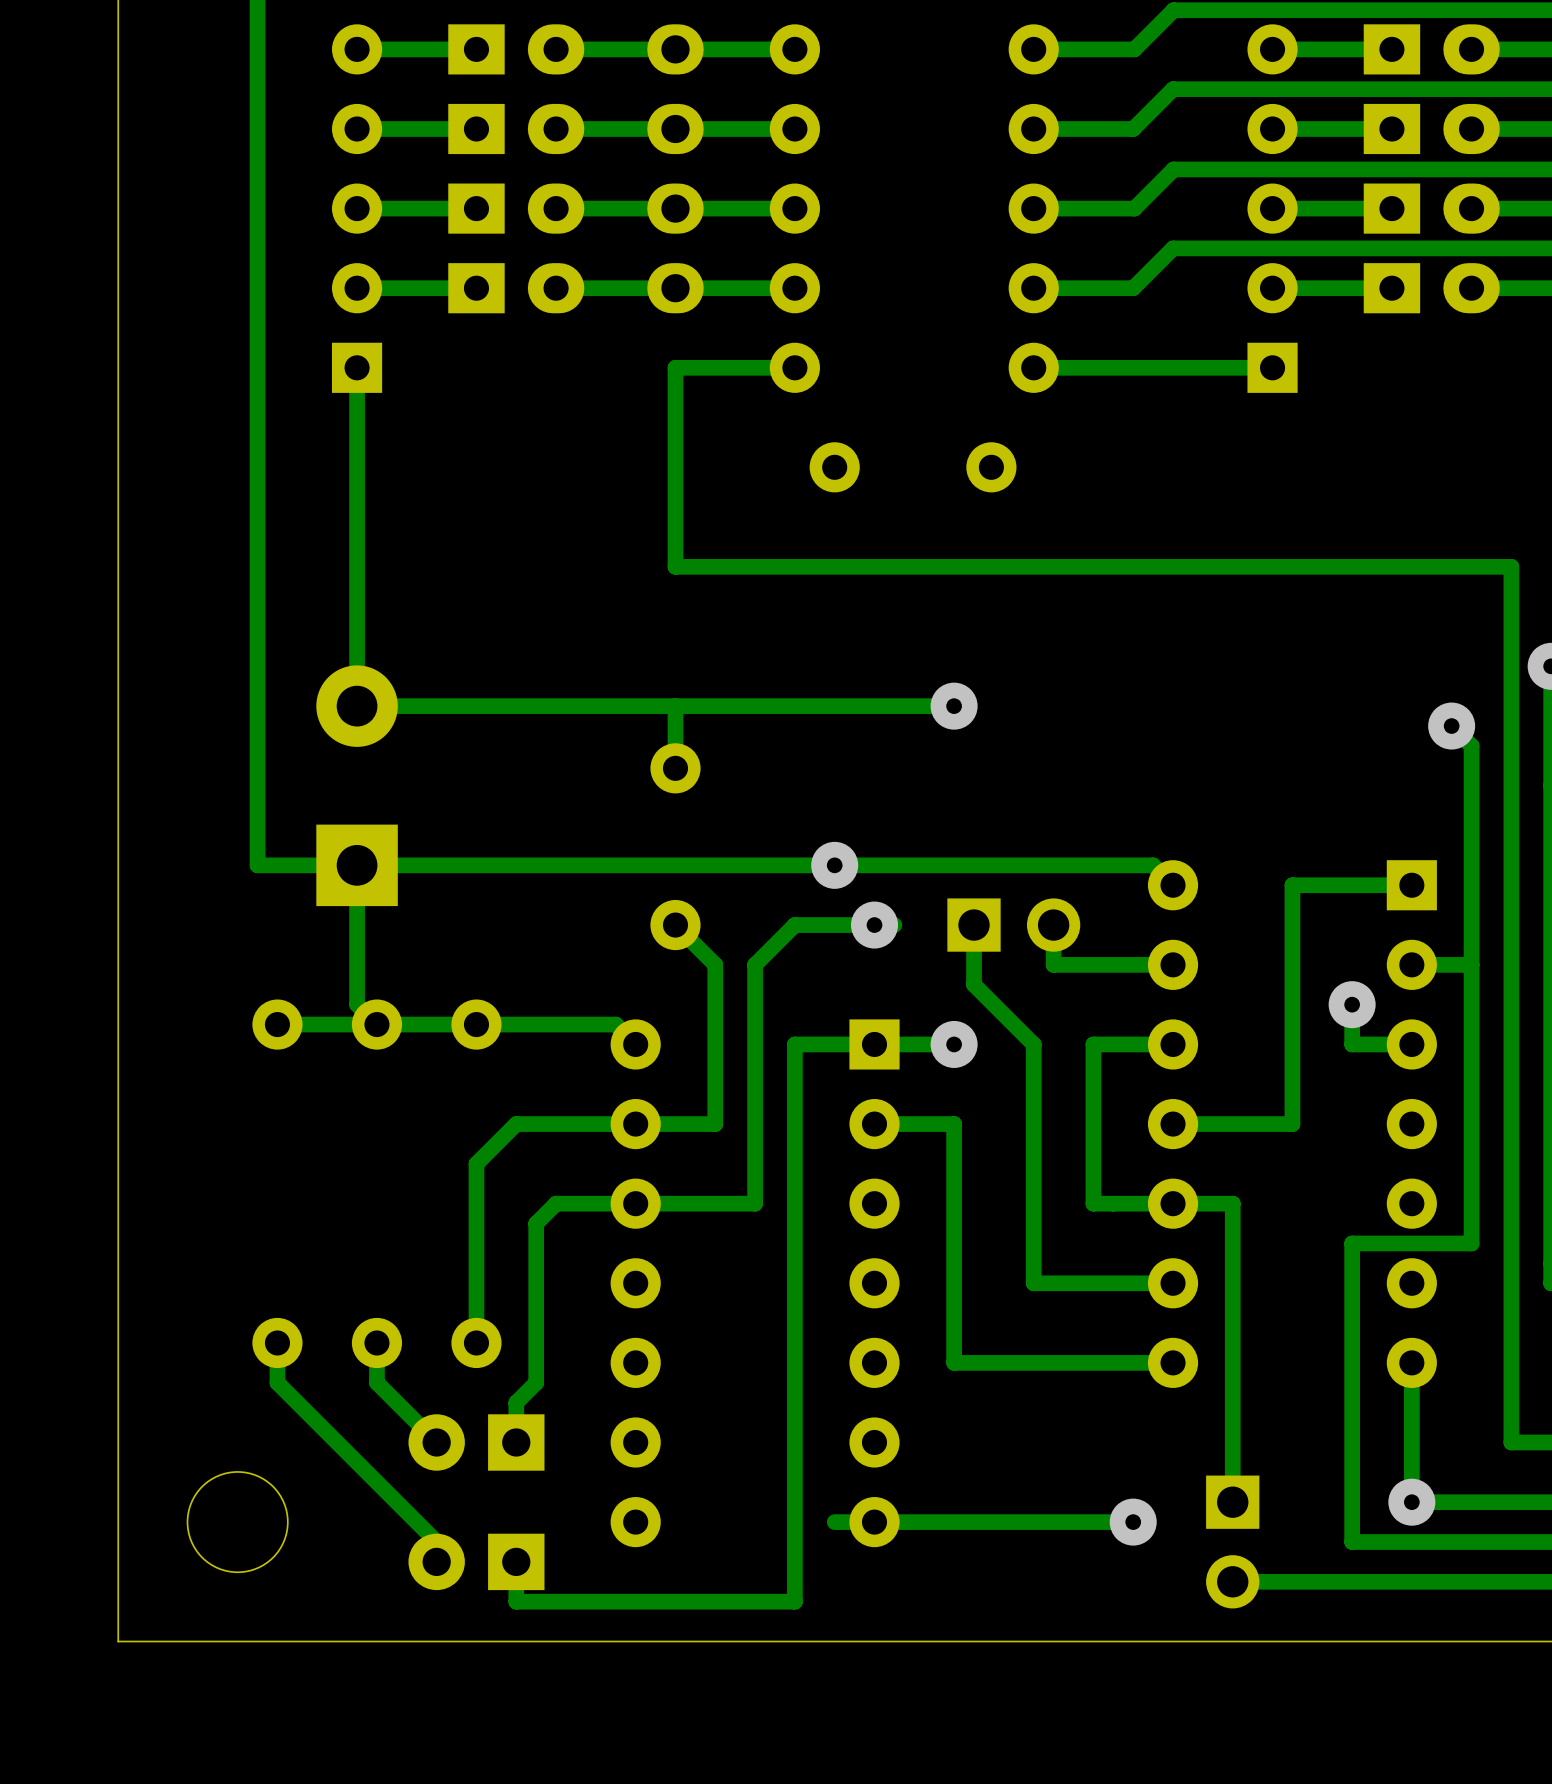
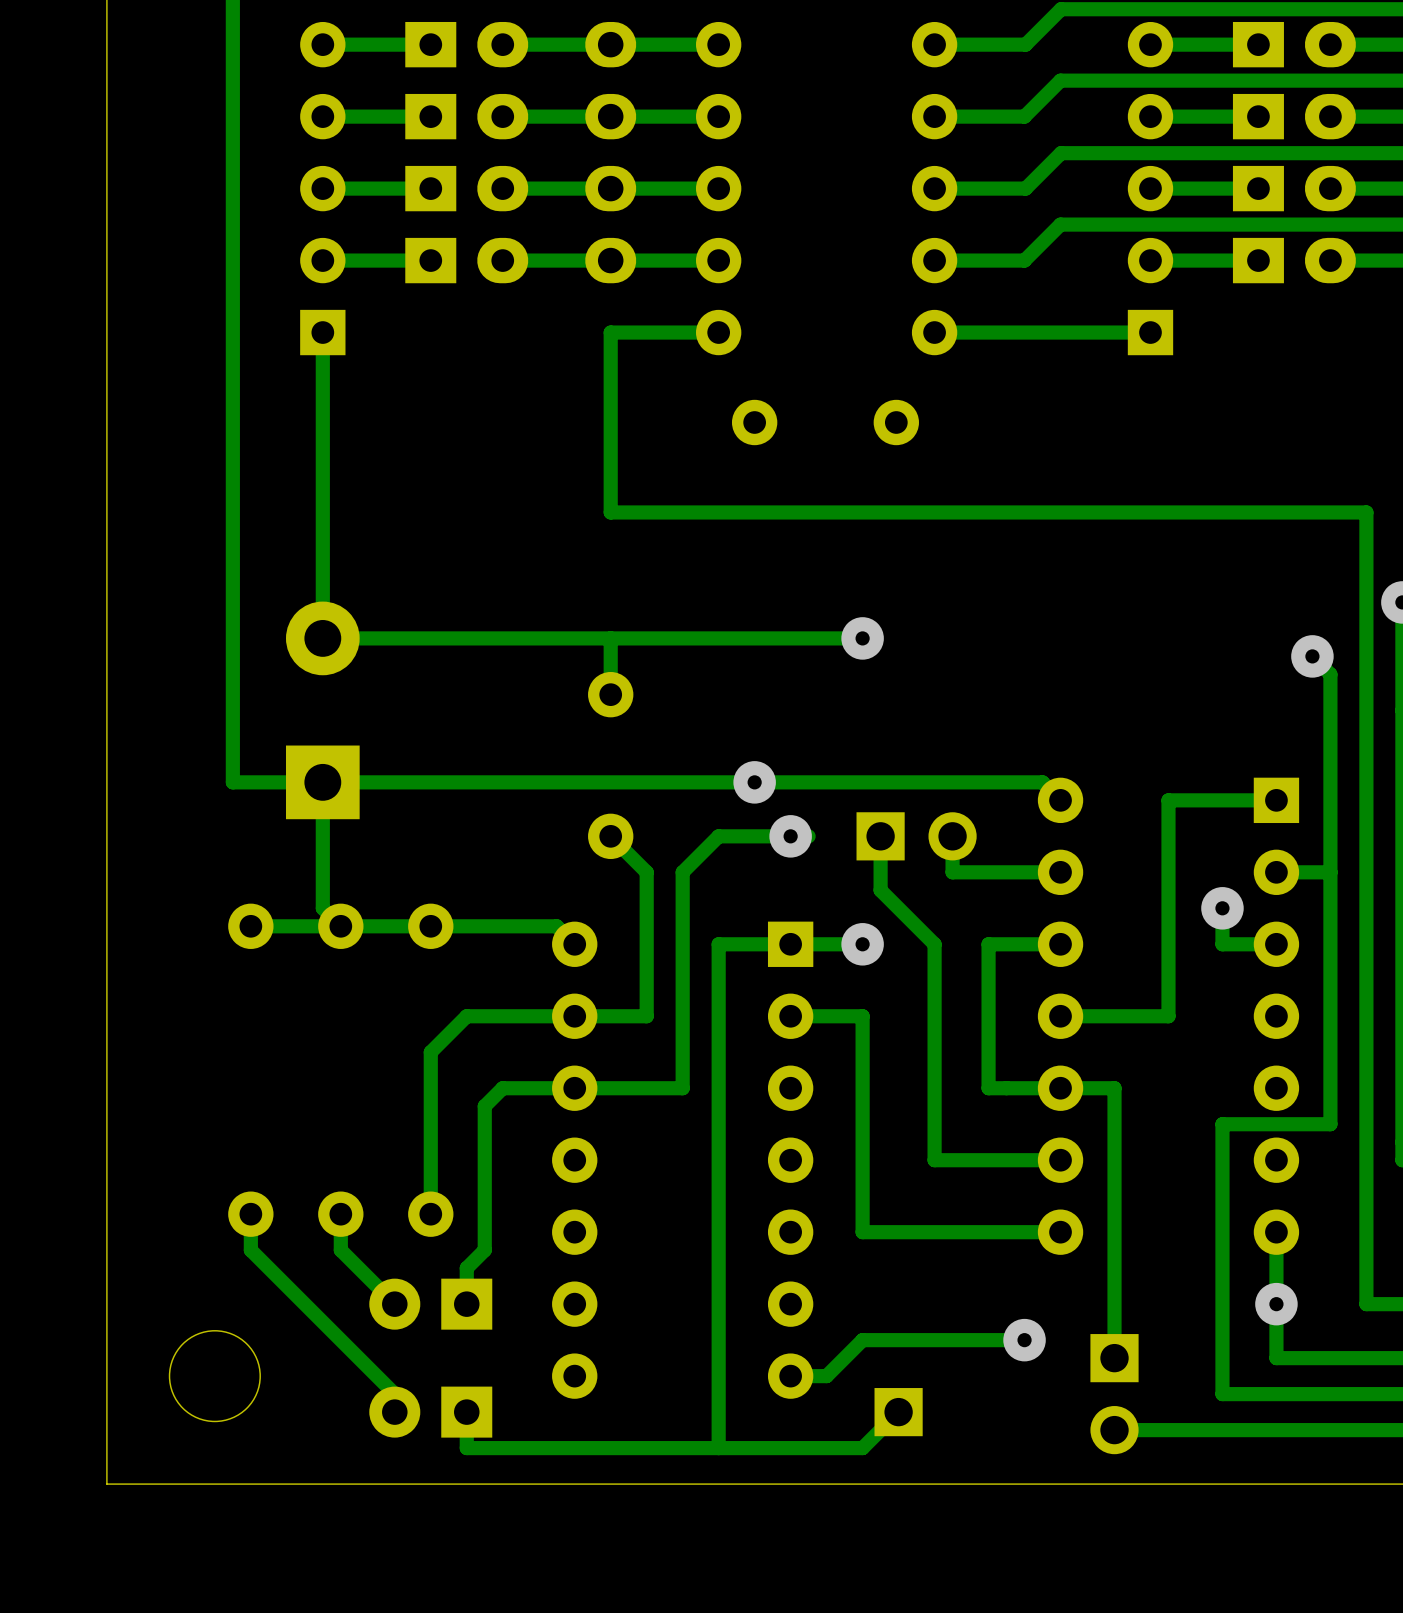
via position: (1411, 1502) -> (1276, 1304)
track: (874, 1522) (834, 1522) -> none
track: (1133, 1522) (914, 1522) -> (1024, 1340) (862, 1340) (826, 1376)
via position: (1133, 1522) -> (1024, 1340)
track: none -> (898, 1412) (862, 1448) (718, 1448)
part: none -> (898, 1412)

